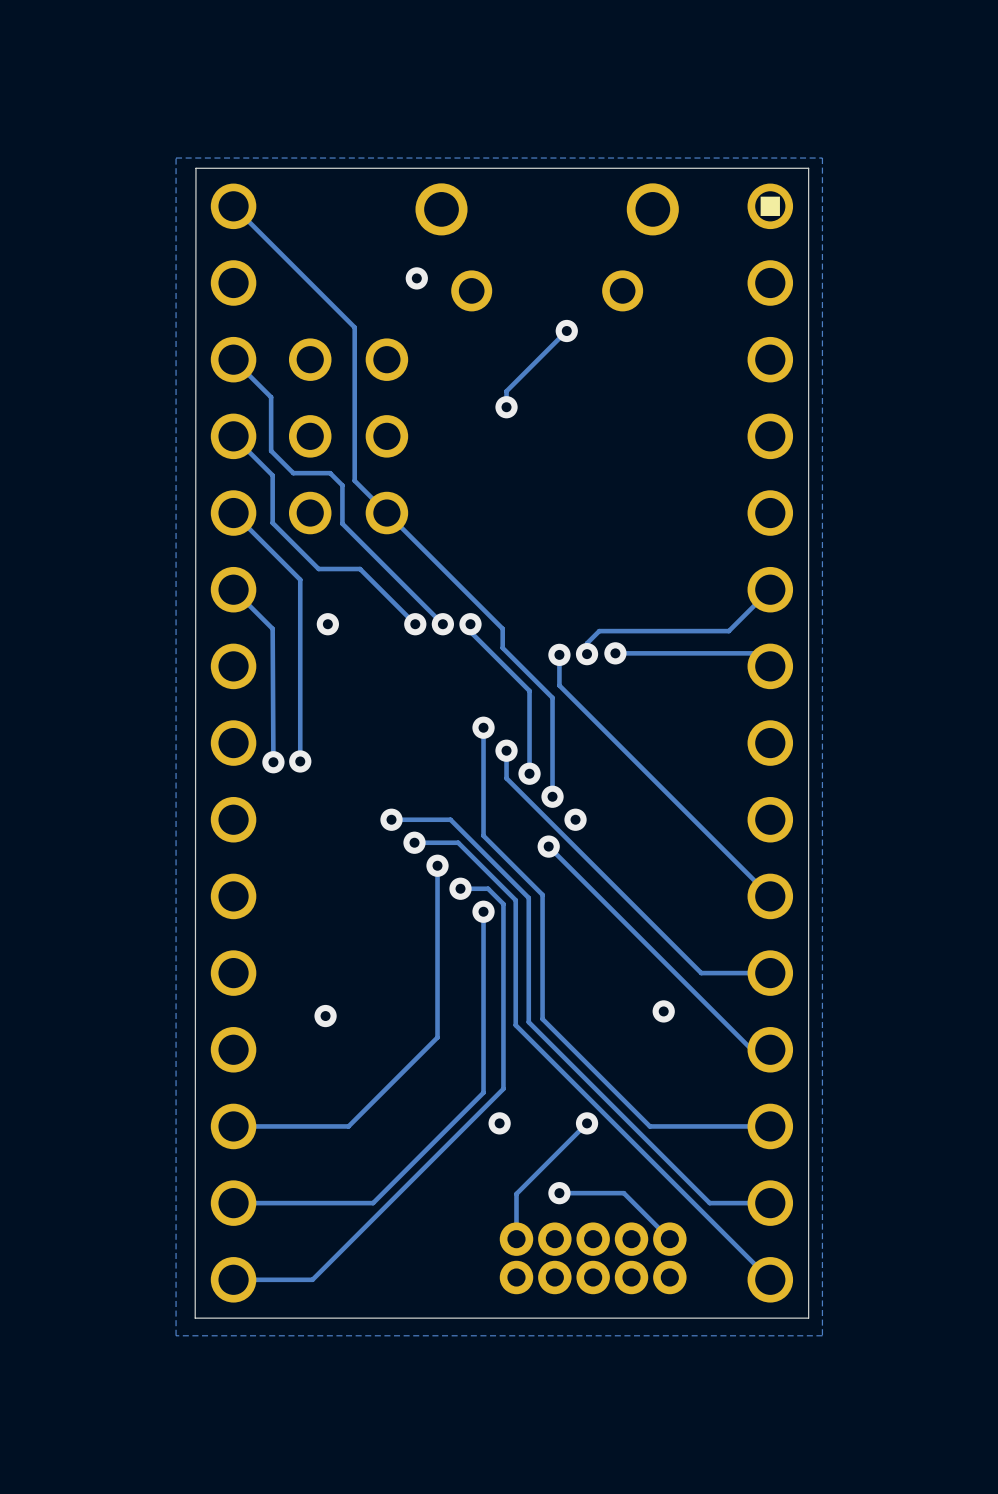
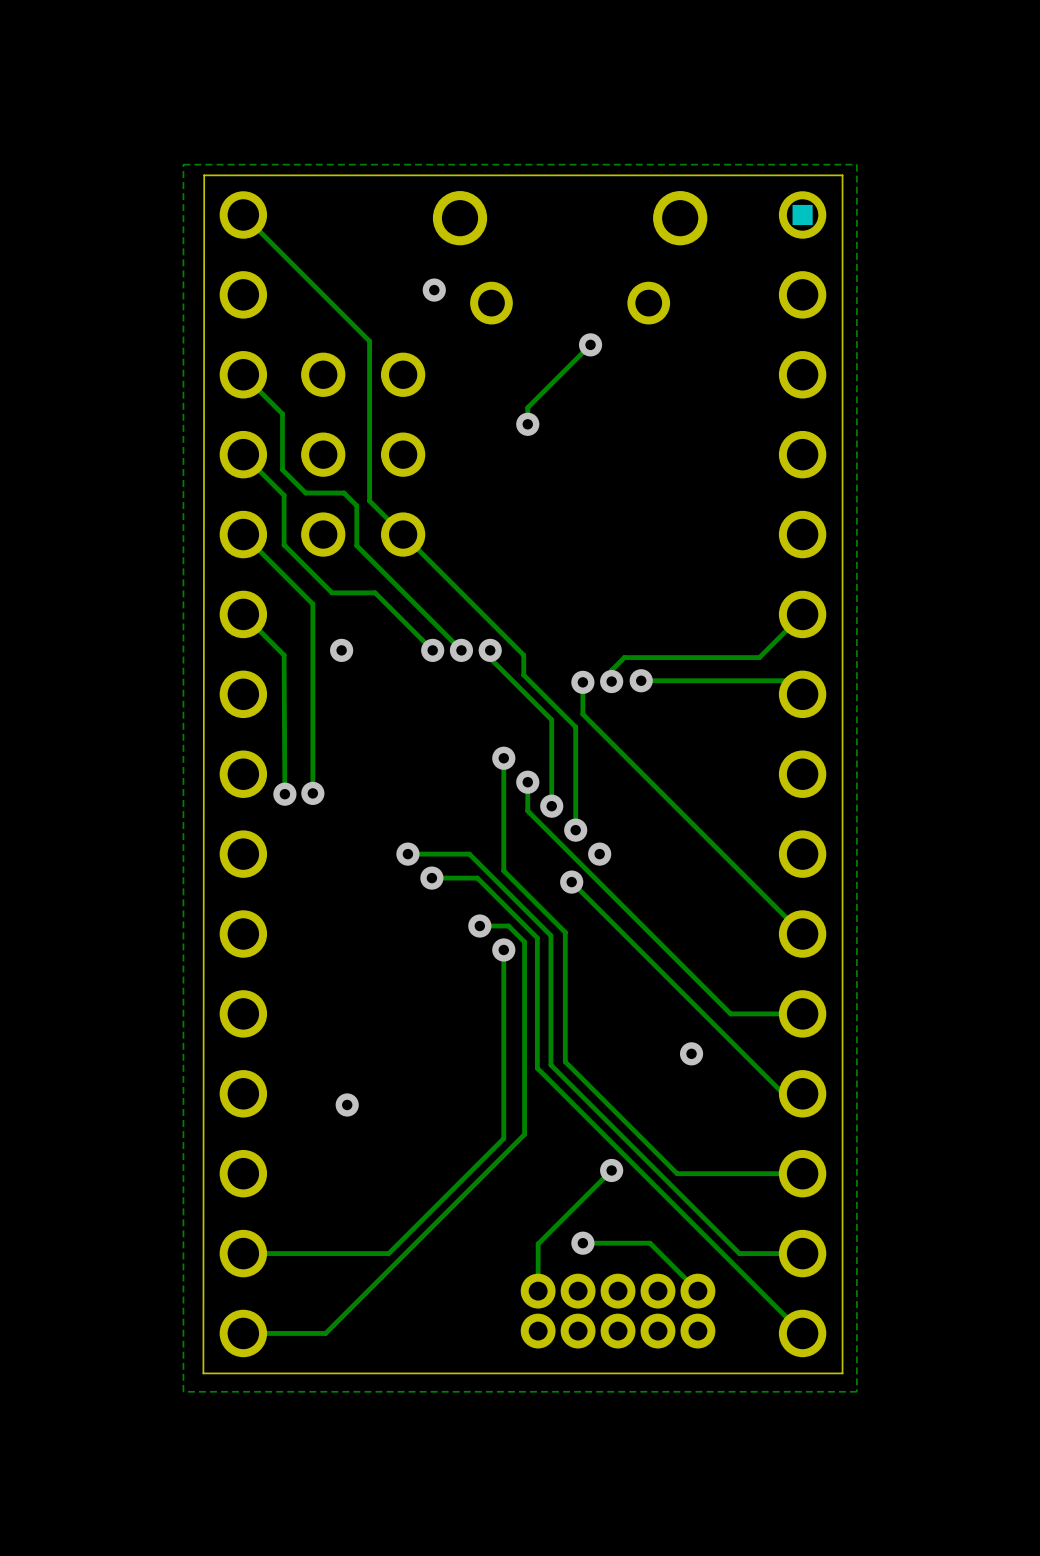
track: (437, 865) (437, 1037) (348, 1126) (233, 1126) -> none
via: (437, 865) -> none
via position: (325, 1016) -> (347, 1104)
via: (499, 1123) -> none

